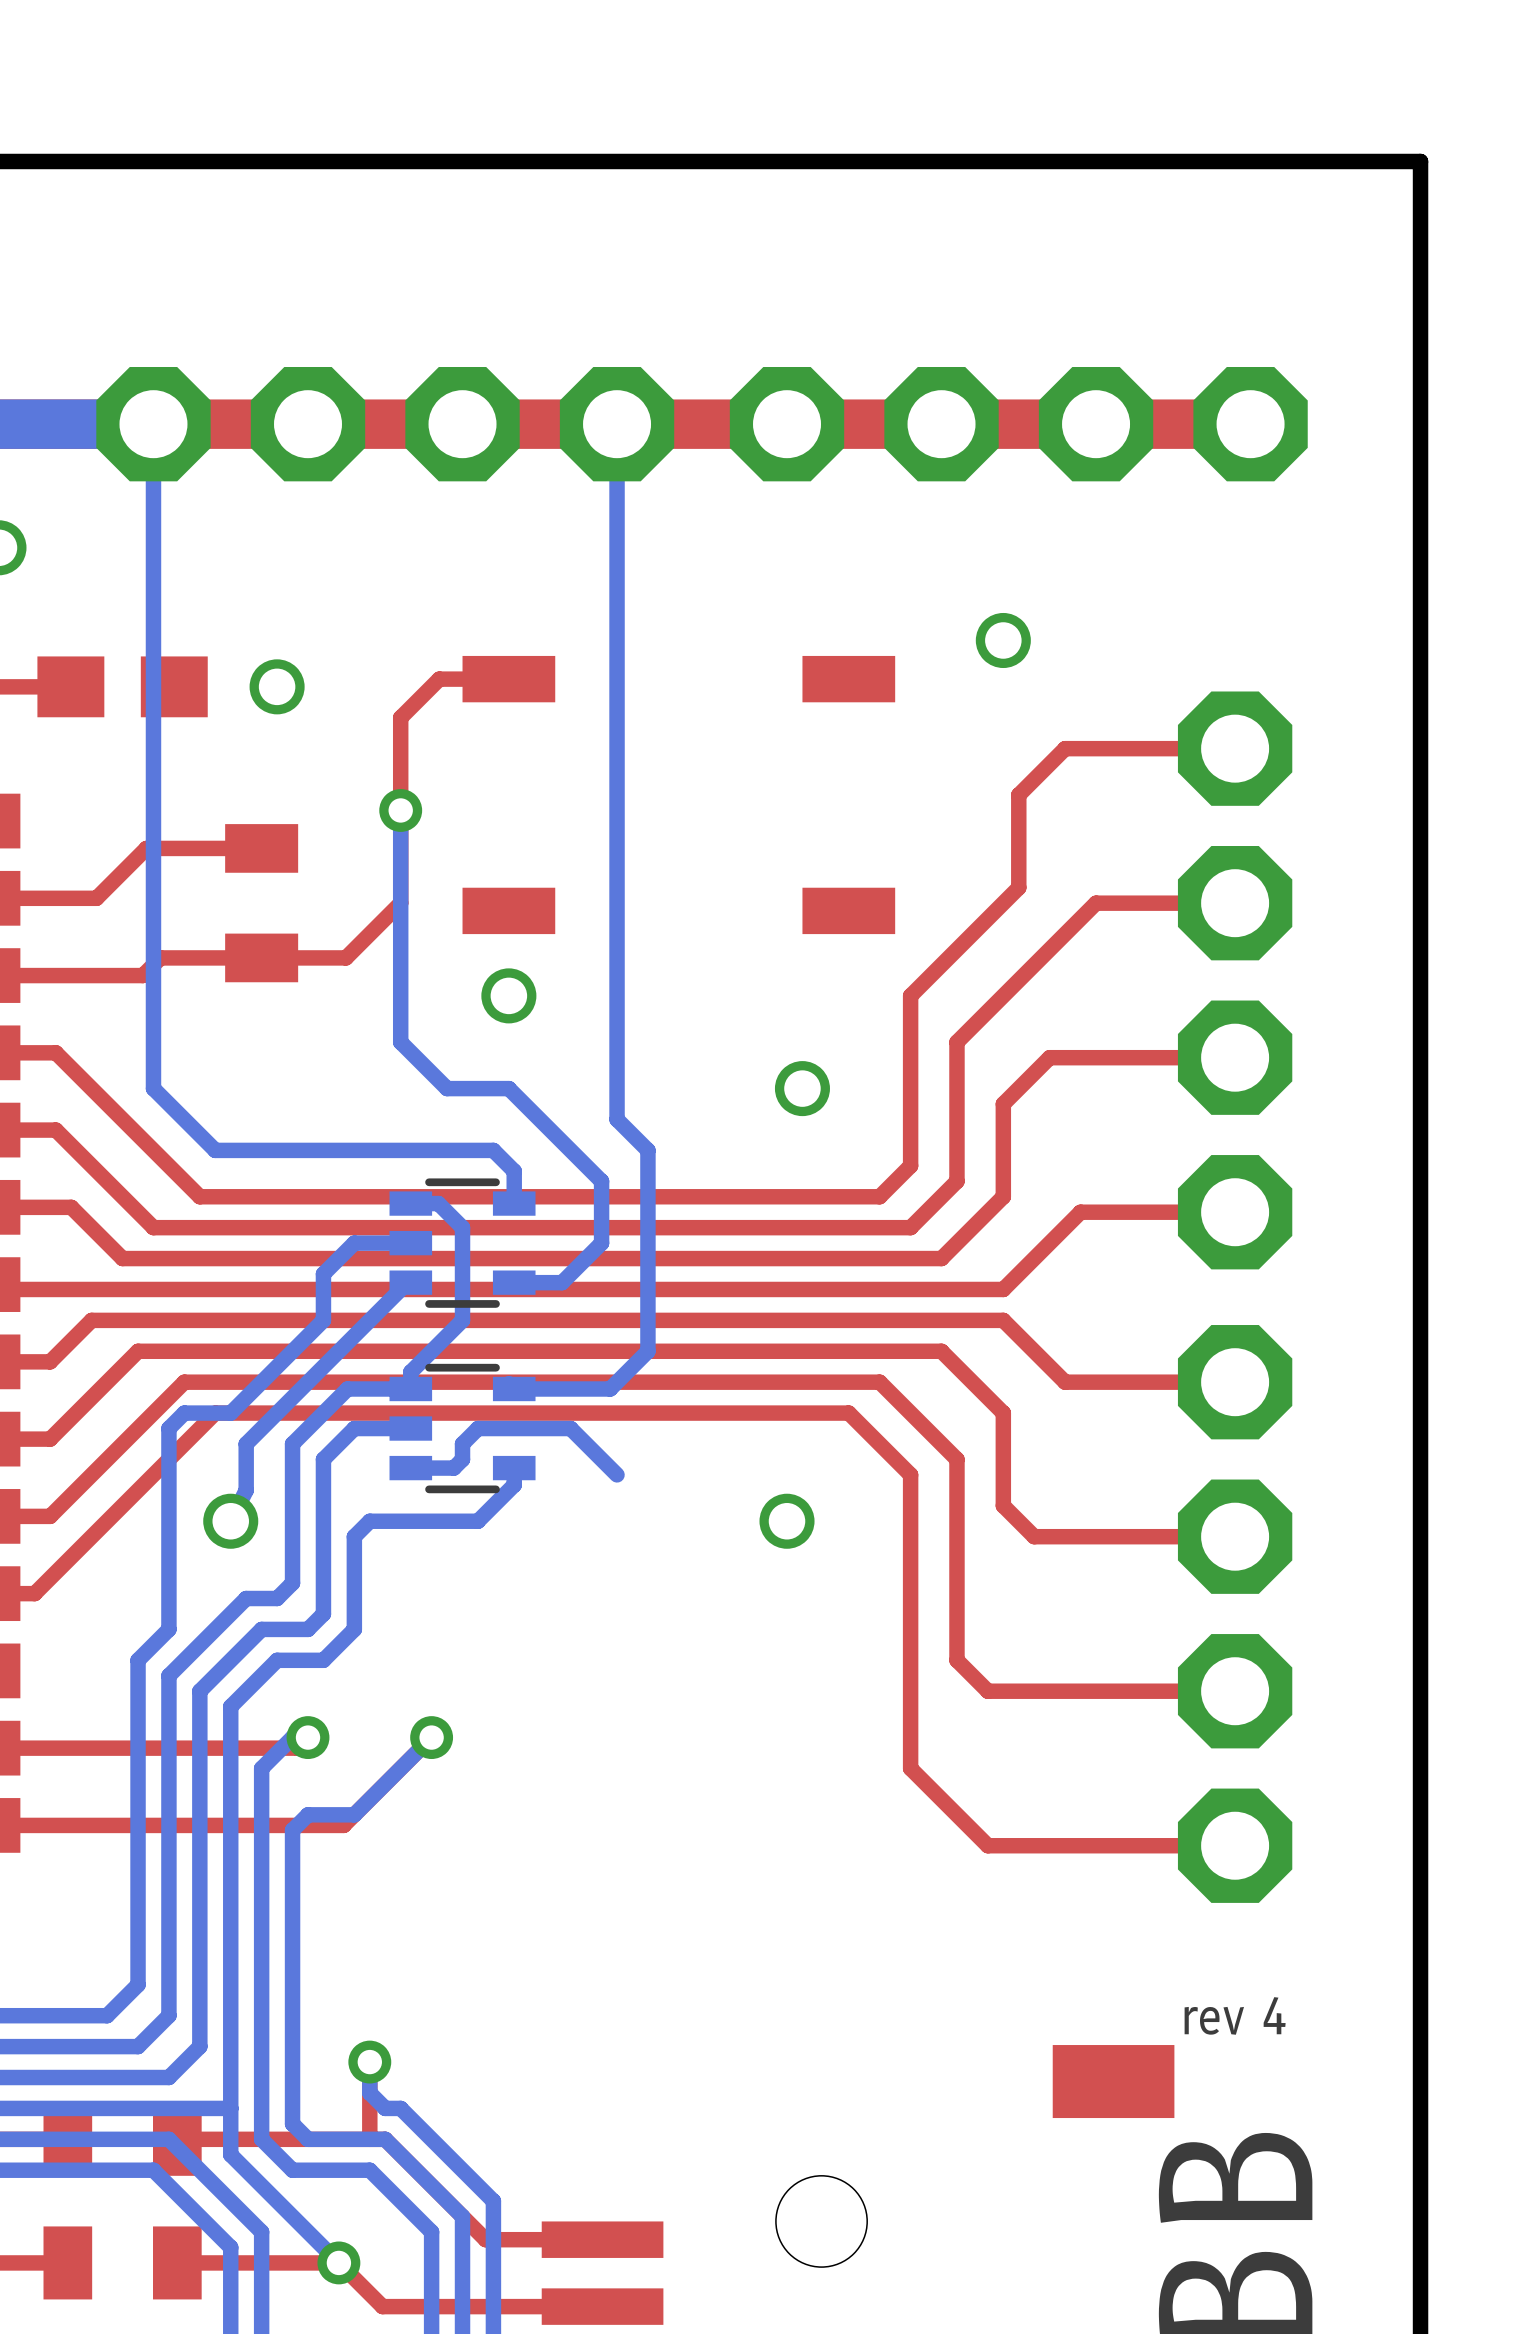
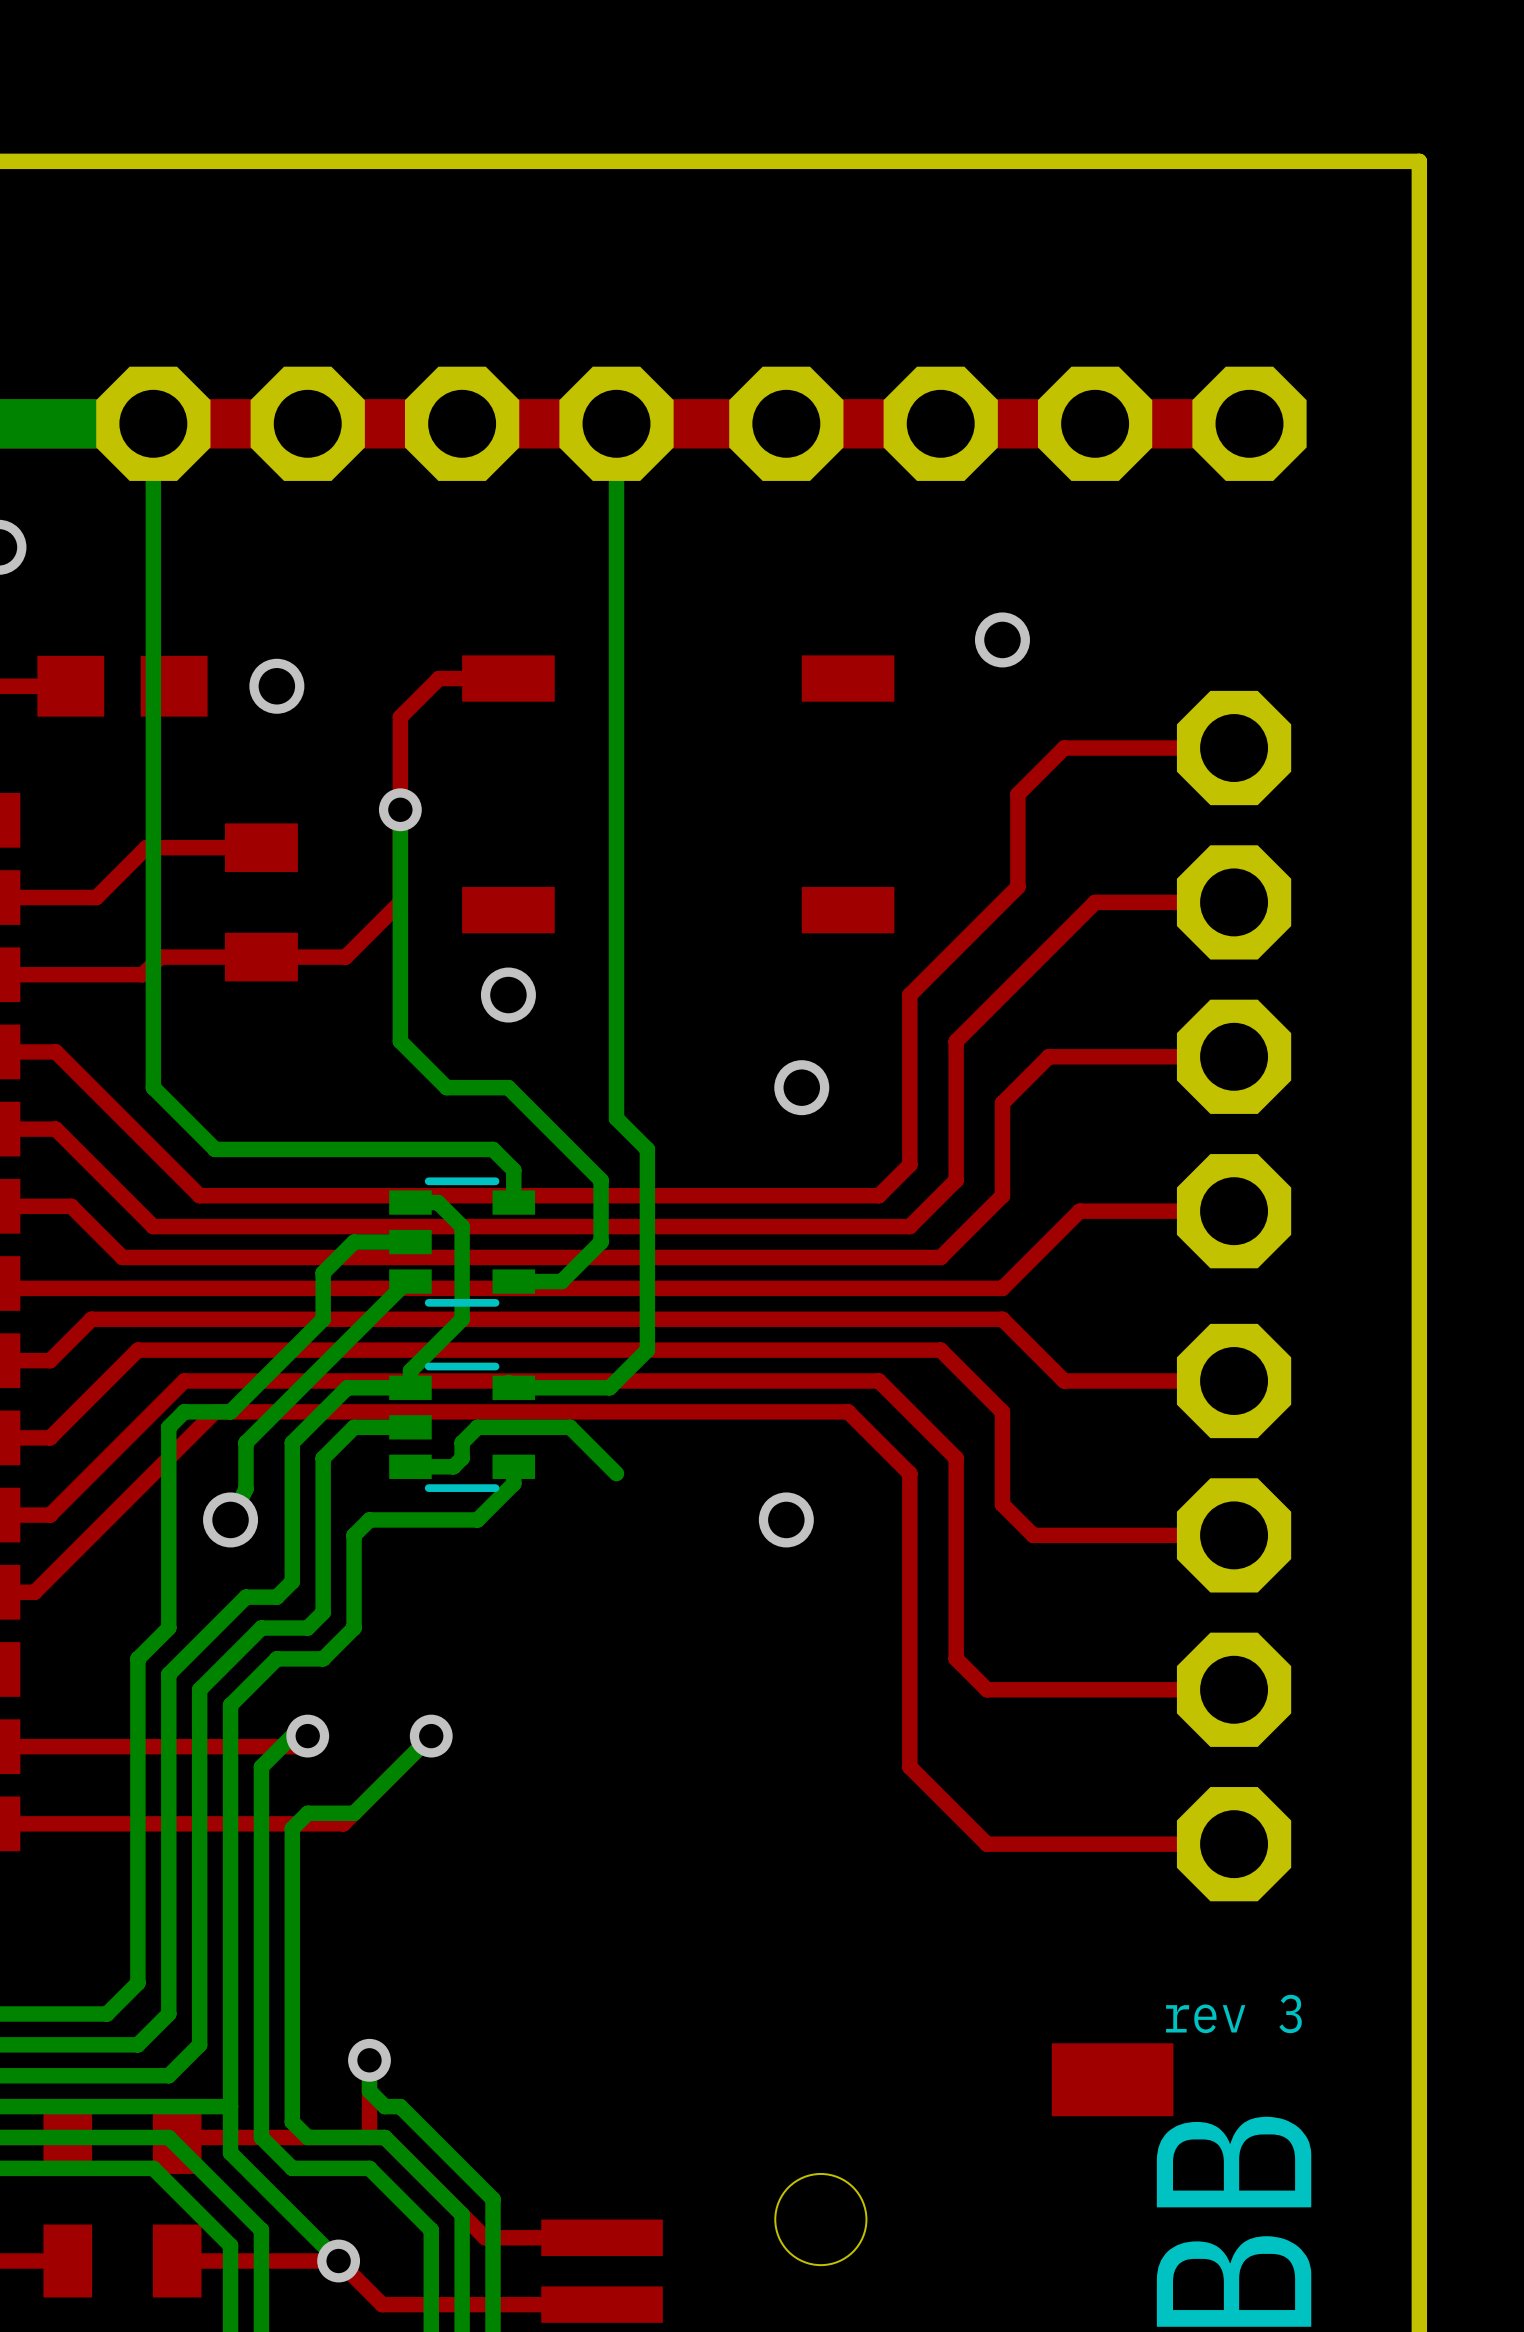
text: rev 4 (1235, 2015) -> rev 3 (1233, 2013)

